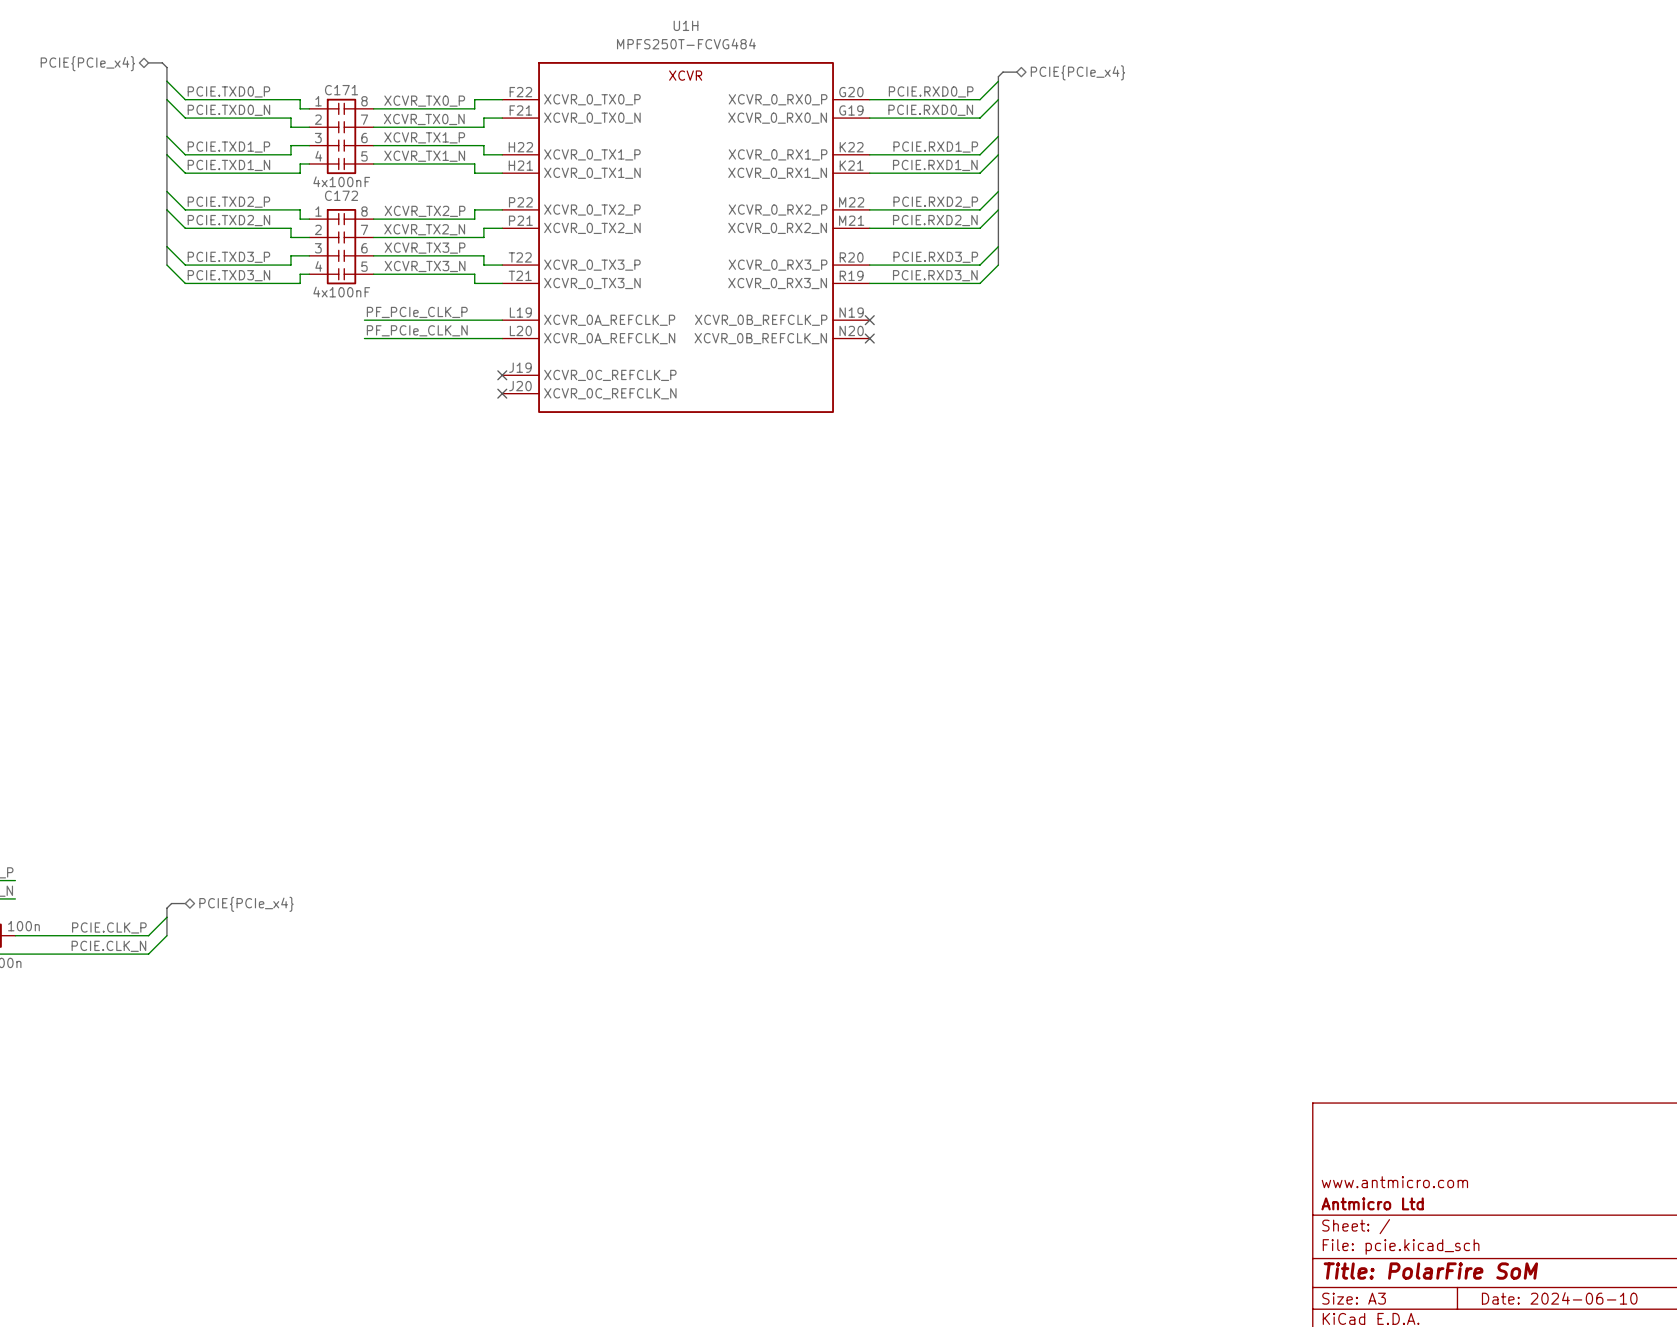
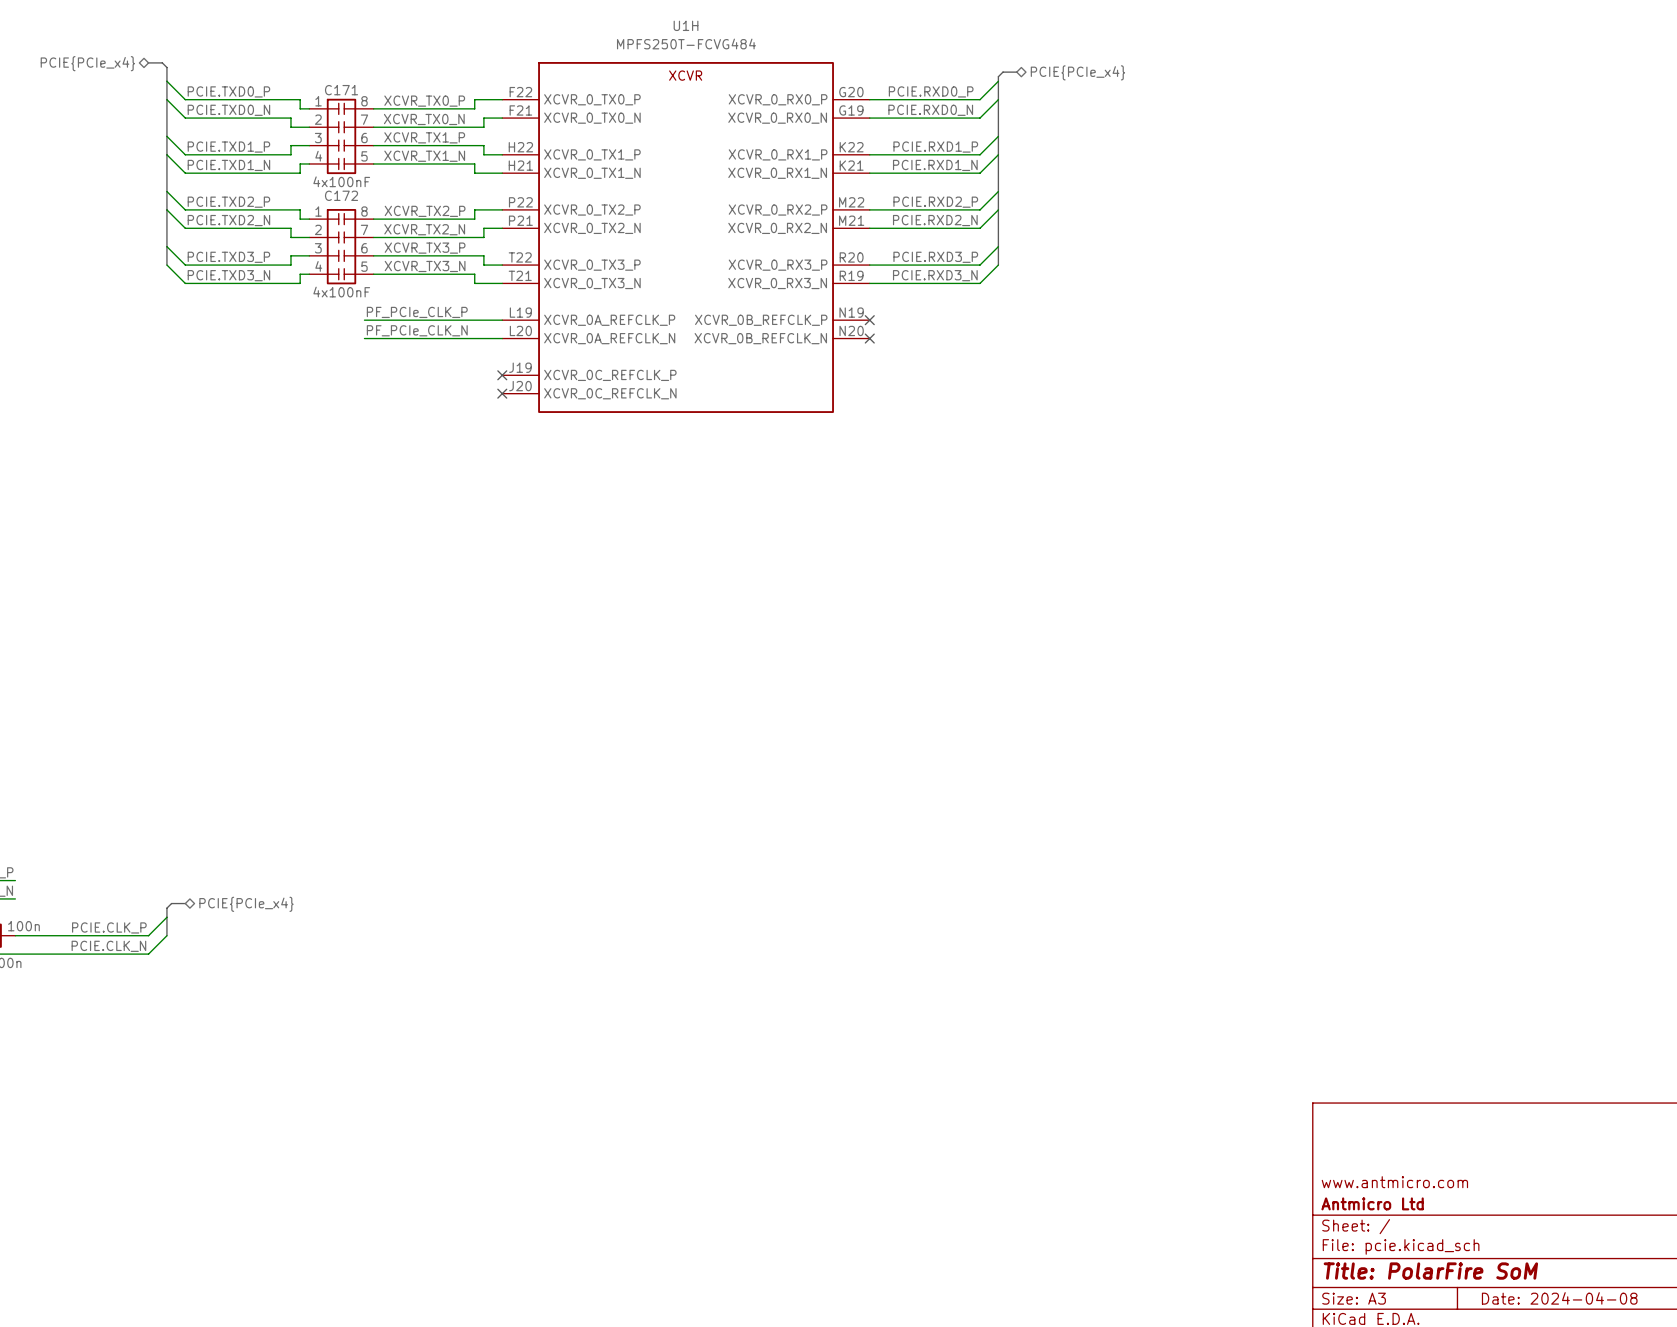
title block: Date: 2024-06-10 (1559, 1298) -> Date: 2024-04-08 (1559, 1298)

